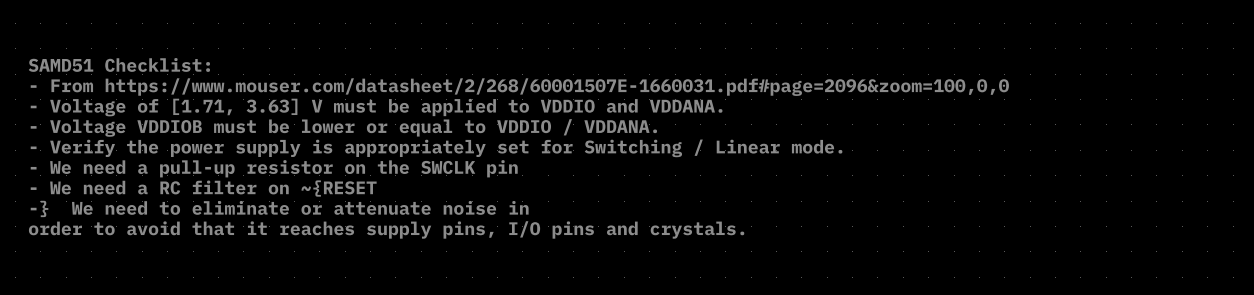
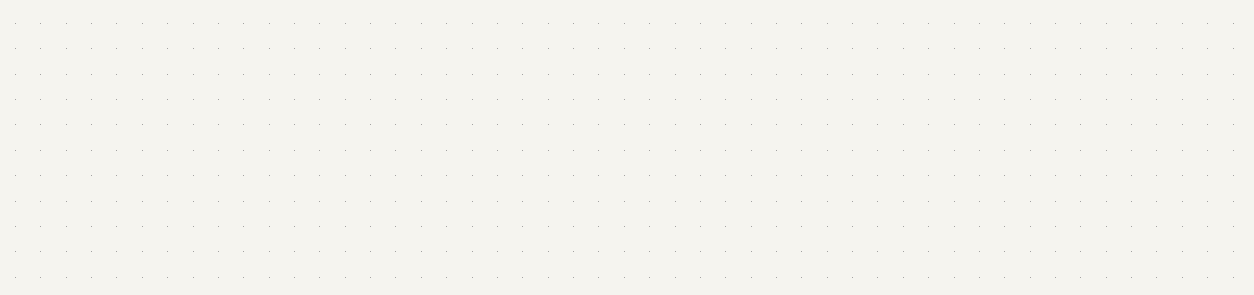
text: SAMD51 Checklist: (119, 64) -> none
text: - From https://www.mouser.com/datasheet/2/268/60001507E-1660031.pdf#page=2096&zoom=100,0,0 (519, 87) -> none
text: - Voltage of [1.71, 3.63] V must be applied to VDDIO and VDDANA. (376, 107) -> none
text: - Voltage VDDIOB must be lower or equal to VDDIO / VDDANA. (343, 127) -> none
text: - Verify the power supply is appropriately set for Switching / Linear mode. (436, 148) -> none
text: - We need a pull-up resistor on the SWCLK pin (274, 168) -> none
text: - We need a RC filter on ~{RESET (203, 188) -> none
text: -} We need to eliminate or attenuate noise in (279, 208) -> none
text: order to avoid that it reaches supply pins, I/O pins and crystals. (386, 229) -> none

